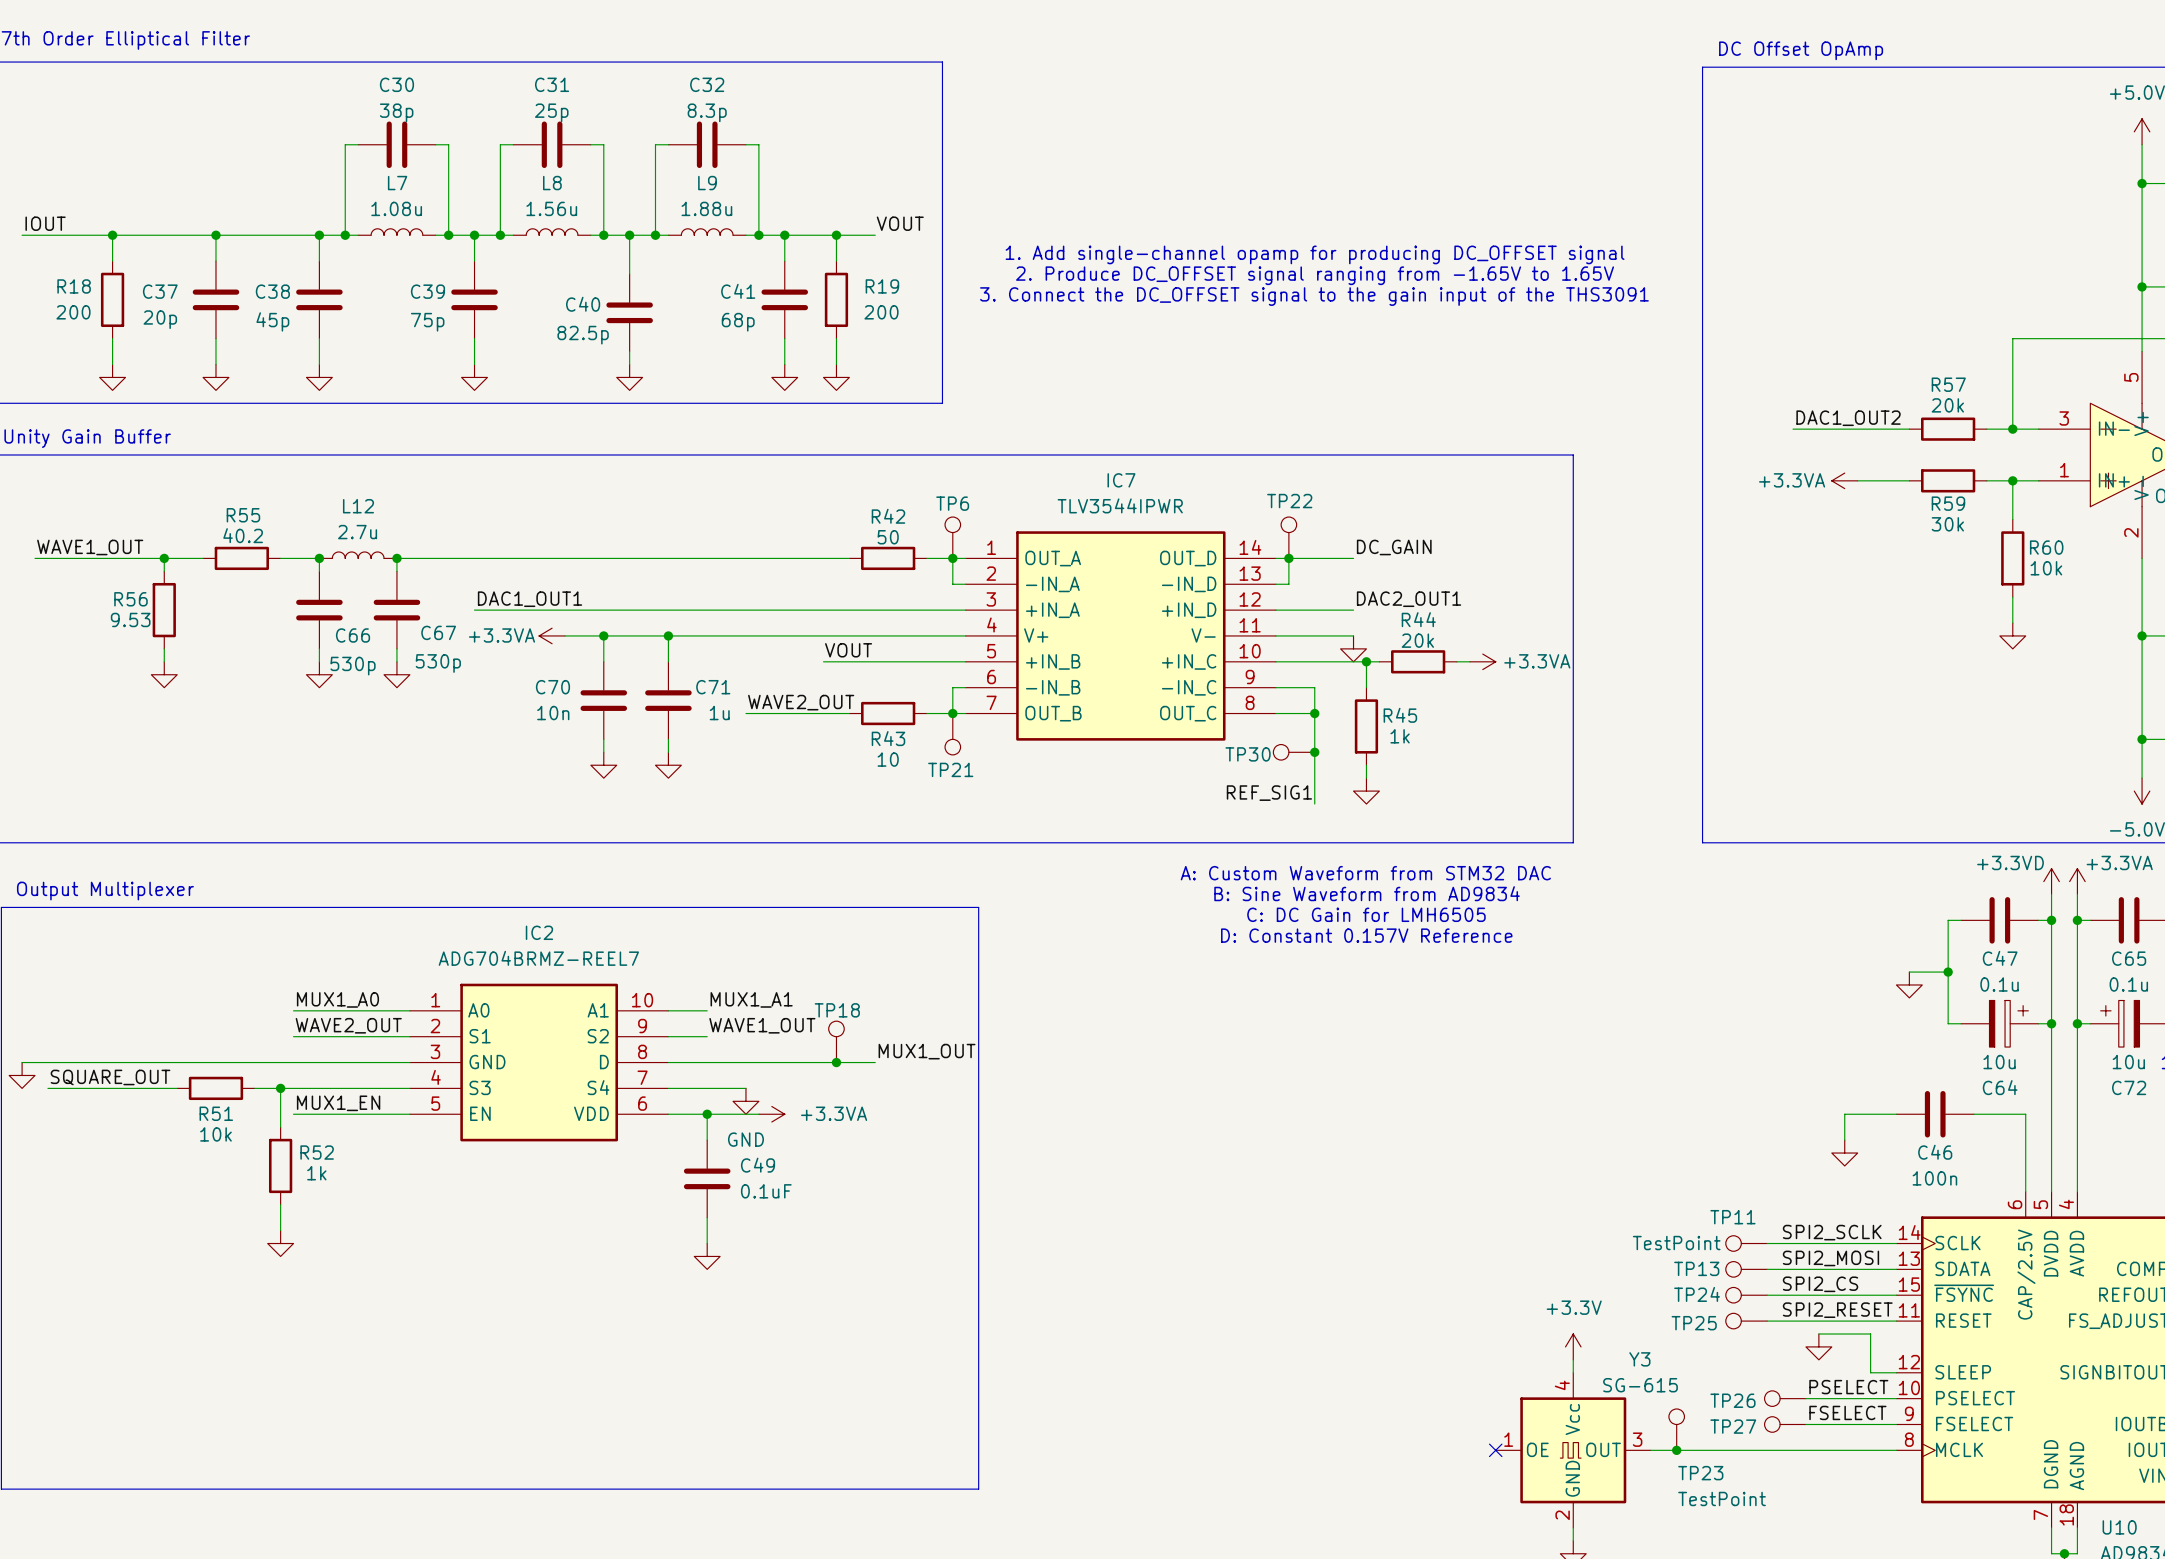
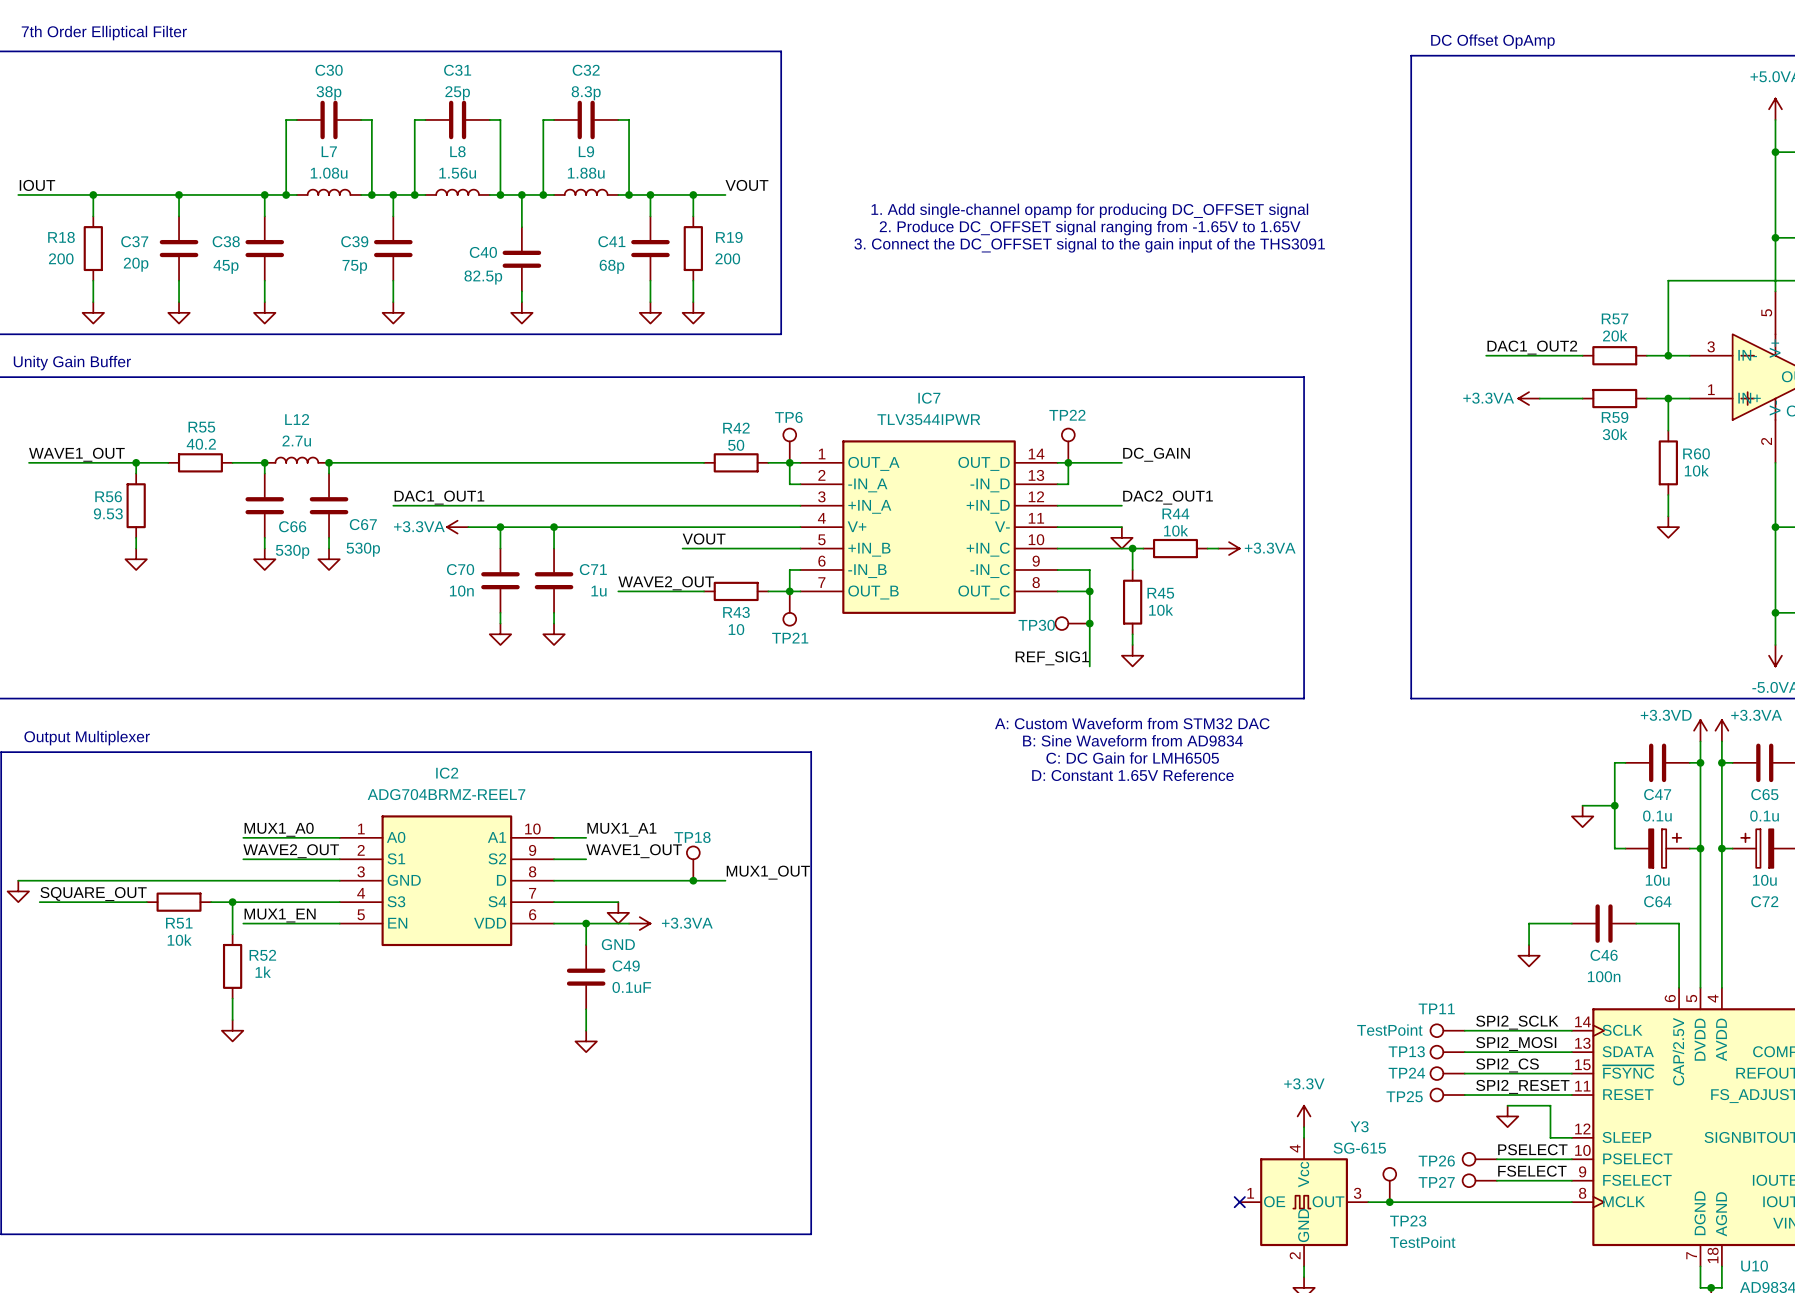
R44 value: 20k (1417, 640) -> 10k (1176, 530)
R45 value: 1k (1400, 736) -> 10k (1161, 610)
text: D: Constant 0.157V Reference (1366, 935) -> D: Constant 1.65V Reference (1132, 775)

